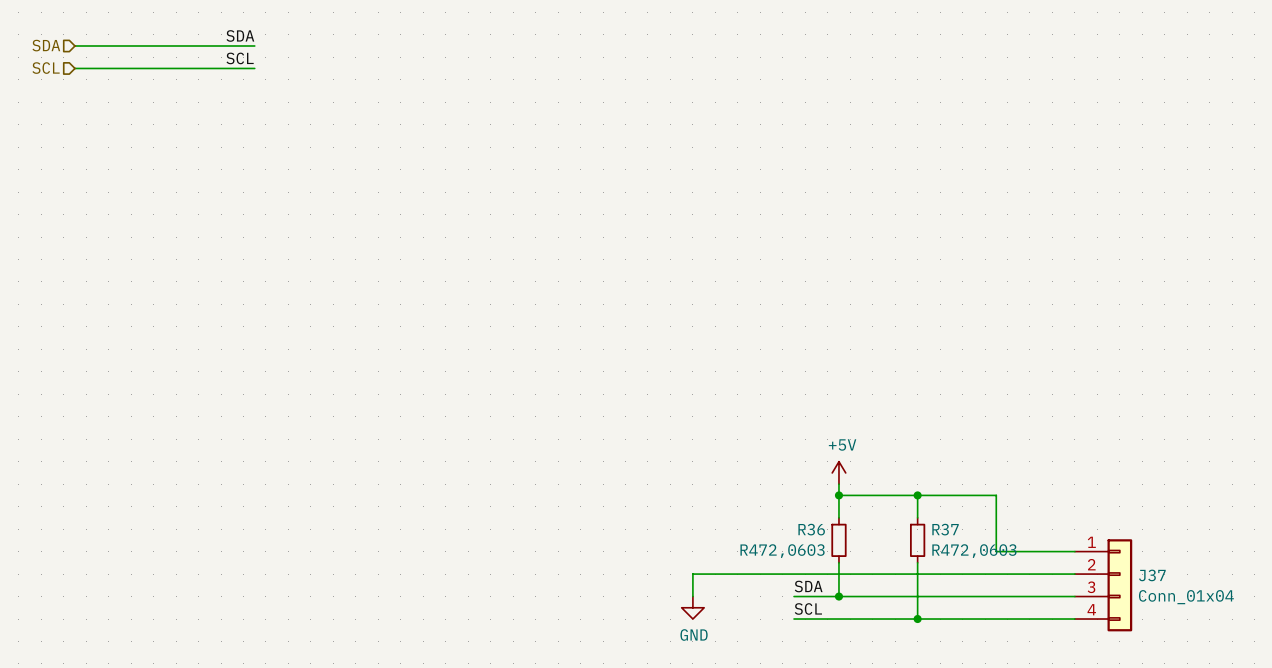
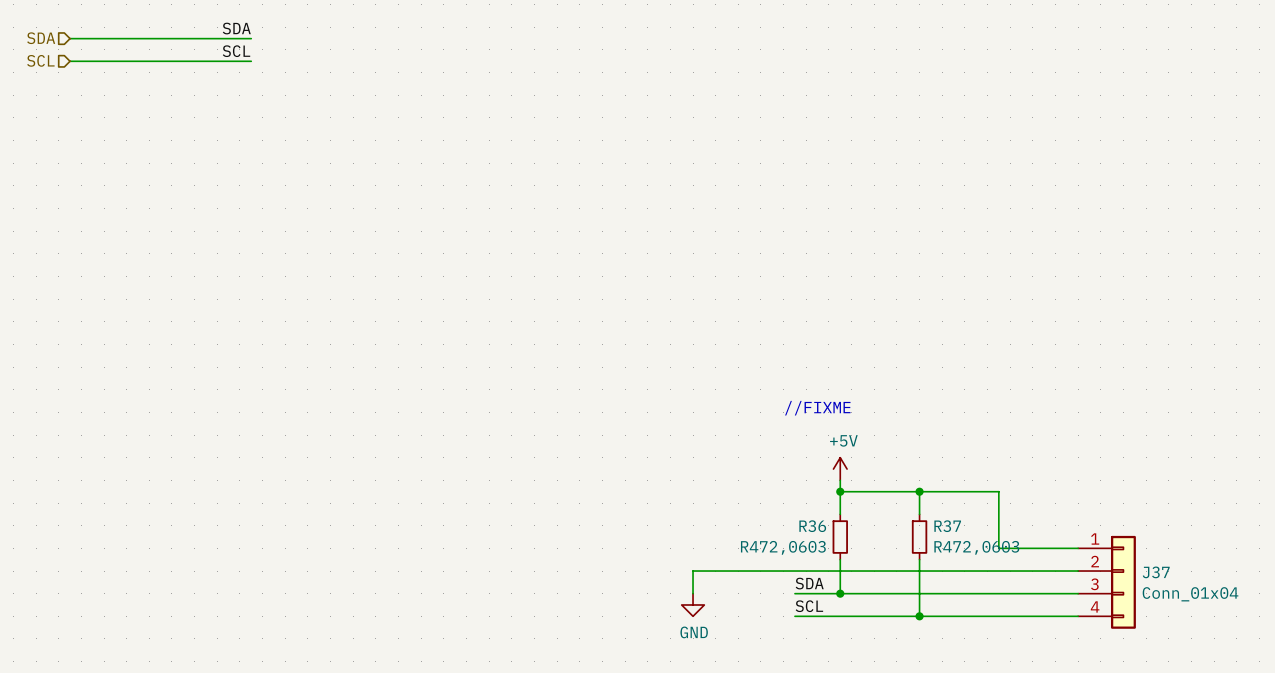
text: none -> //FIXME (817, 408)

